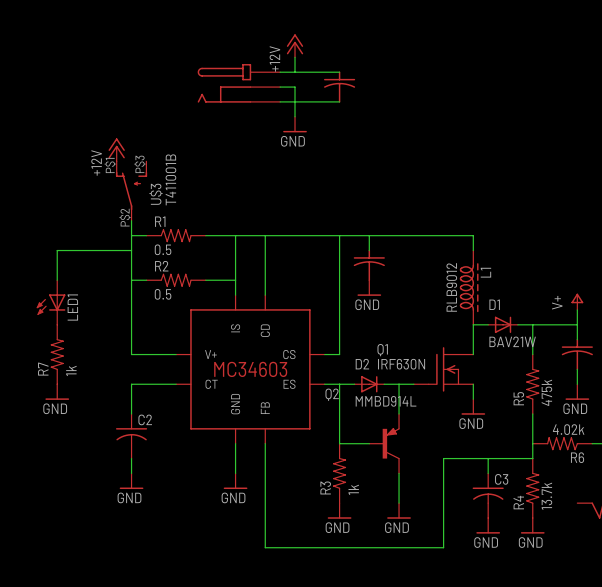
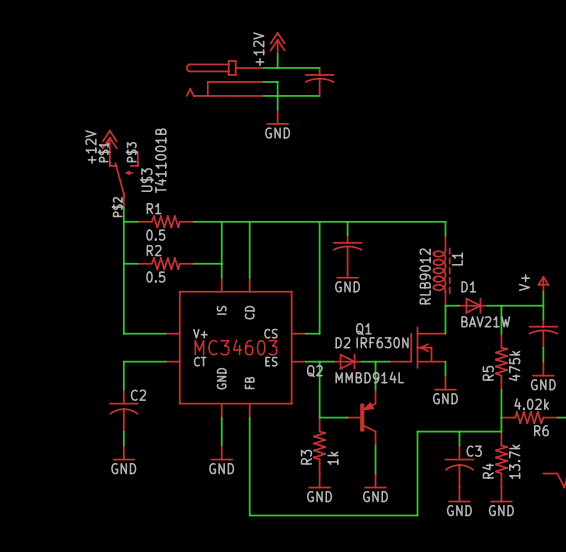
wire: (131, 250) (57, 250) (57, 280) -> none
LED1: (51, 302) -> none
R7: 1k (57, 354) -> none
power symbol: GND (57, 392) -> none

